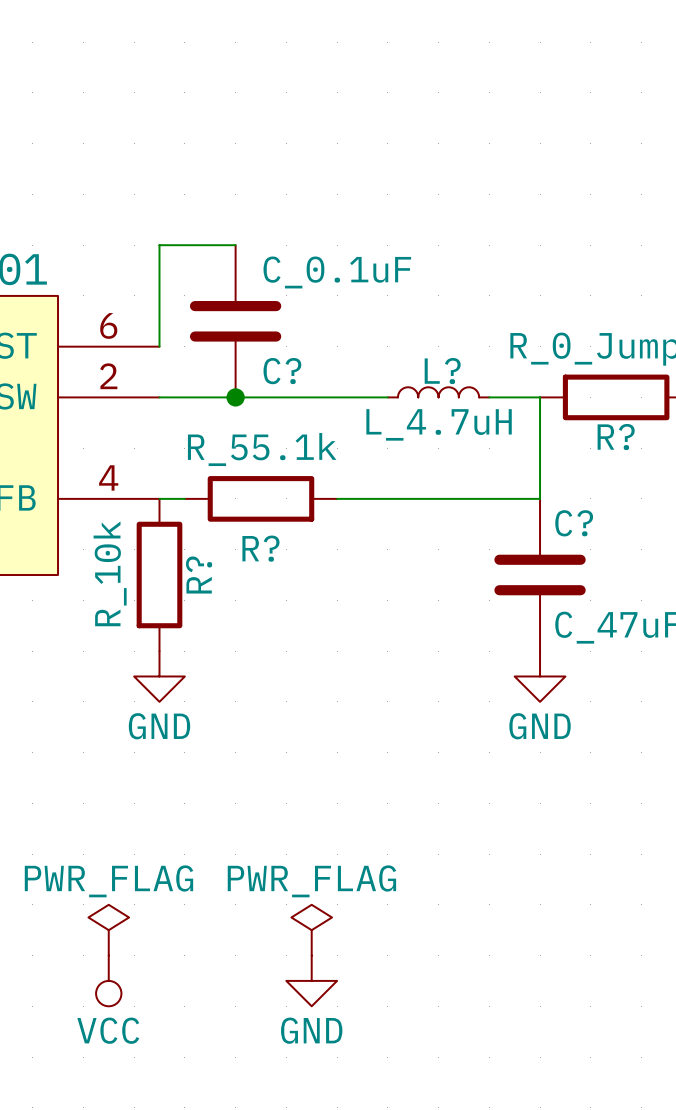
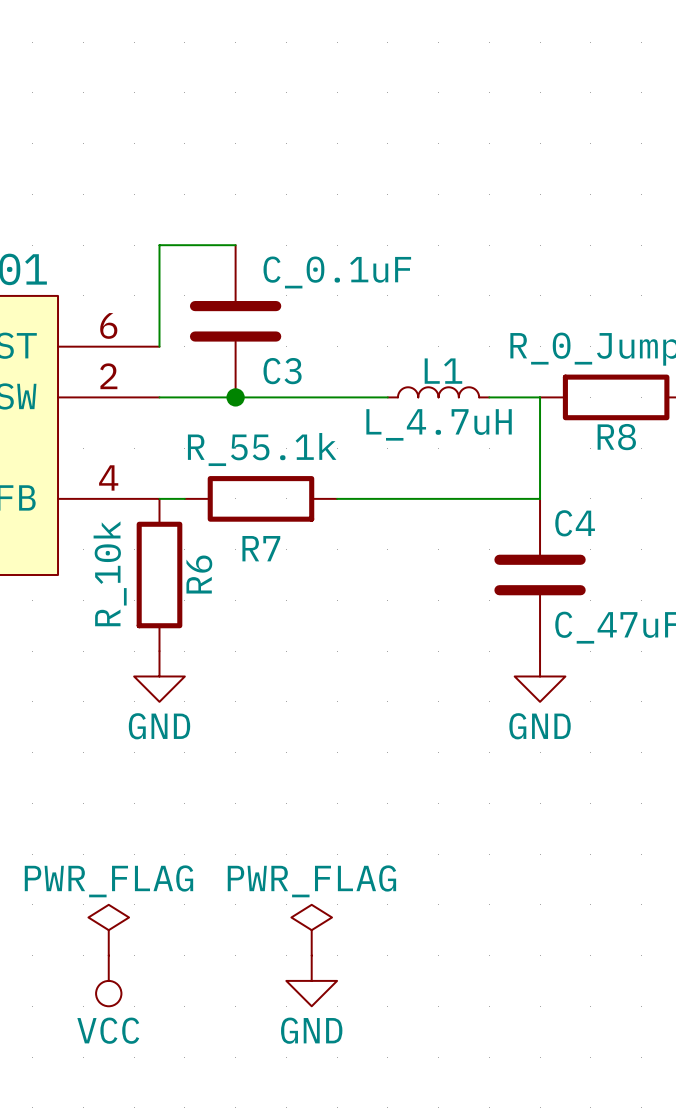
C? name: C? (282, 371) -> C3 (282, 371)
L? name: L? (442, 371) -> L1 (443, 371)
R? name: R? (616, 437) -> R8 (616, 437)
C? name: C? (574, 523) -> C4 (575, 523)
R? name: R? (260, 548) -> R7 (261, 548)
R? name: R? (199, 575) -> R6 (199, 574)

